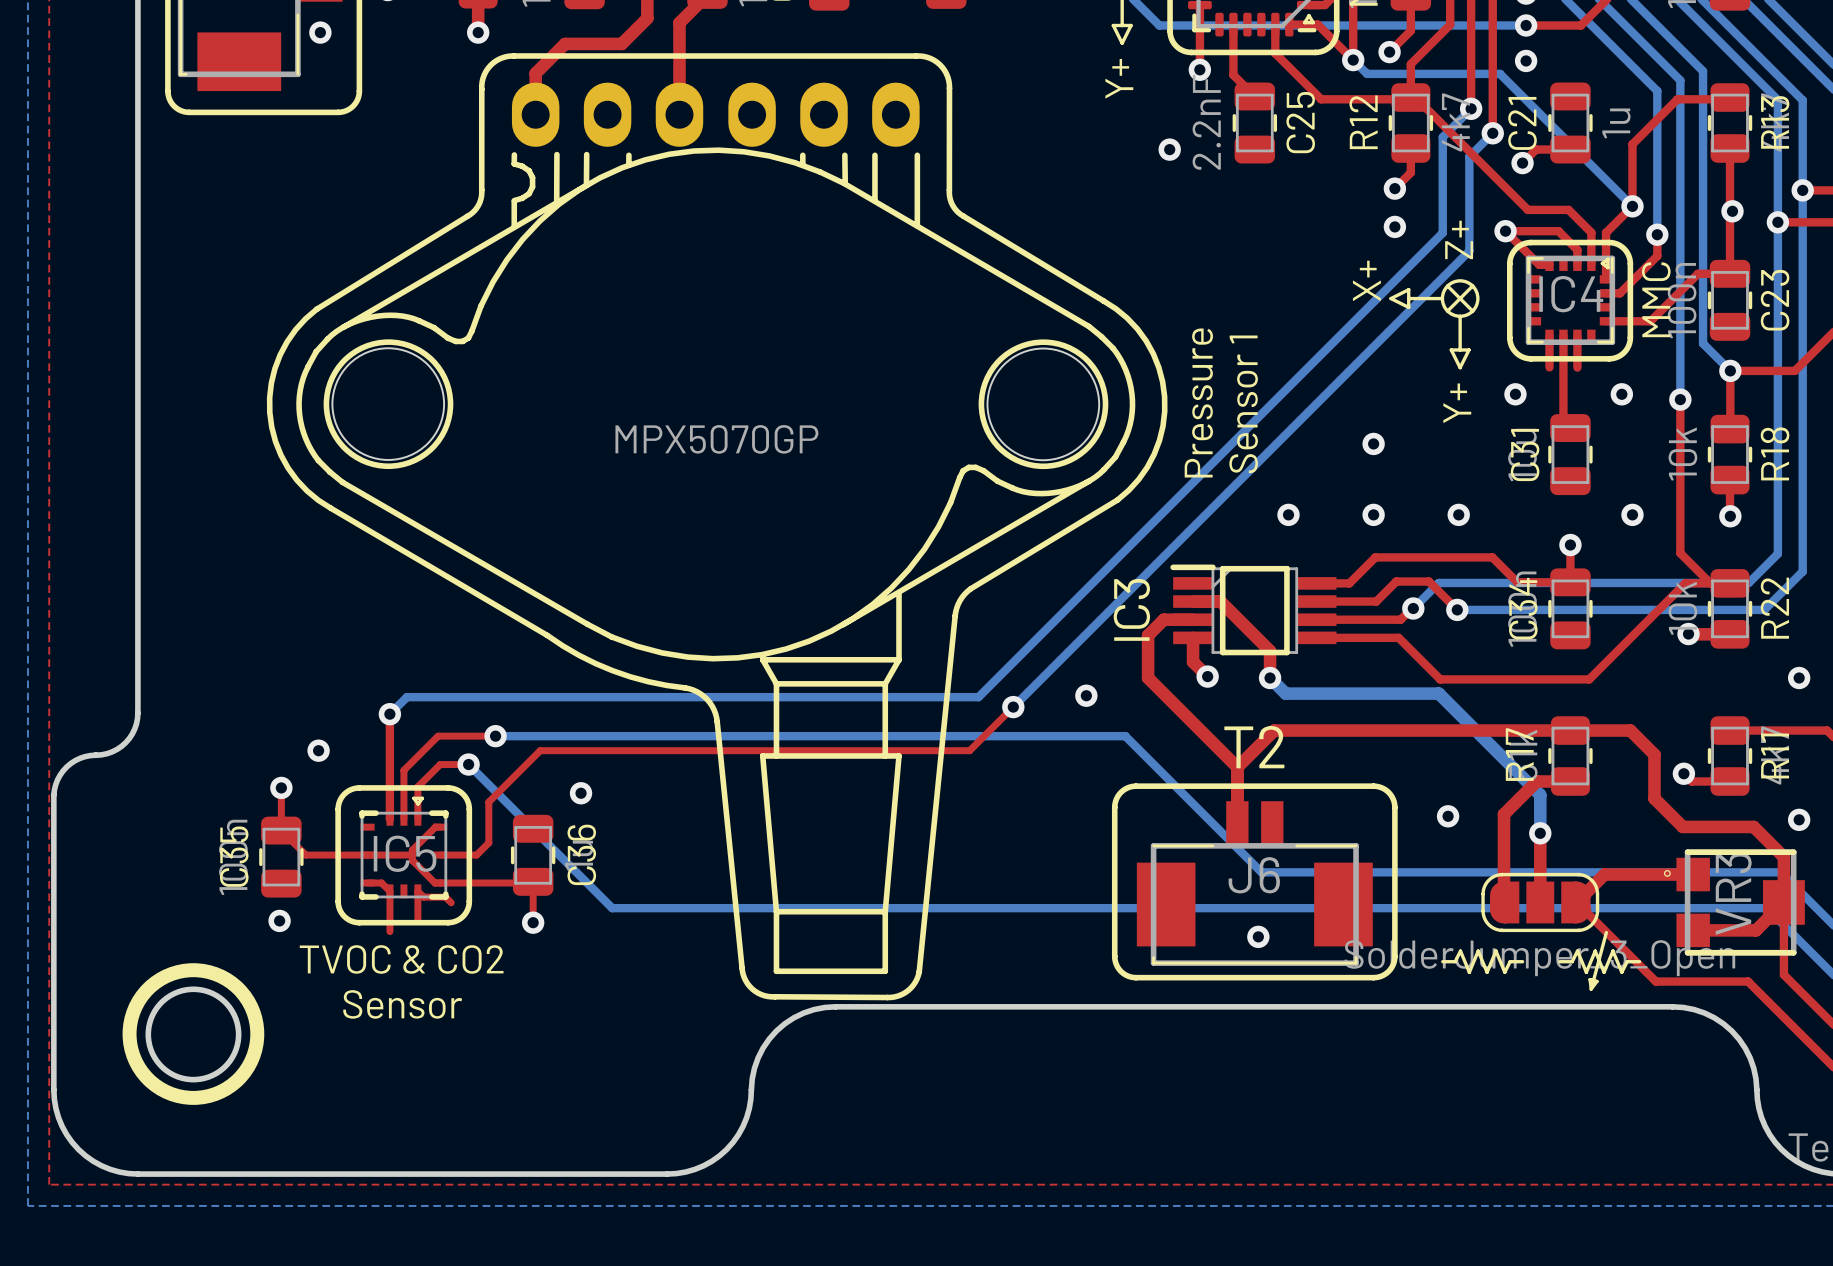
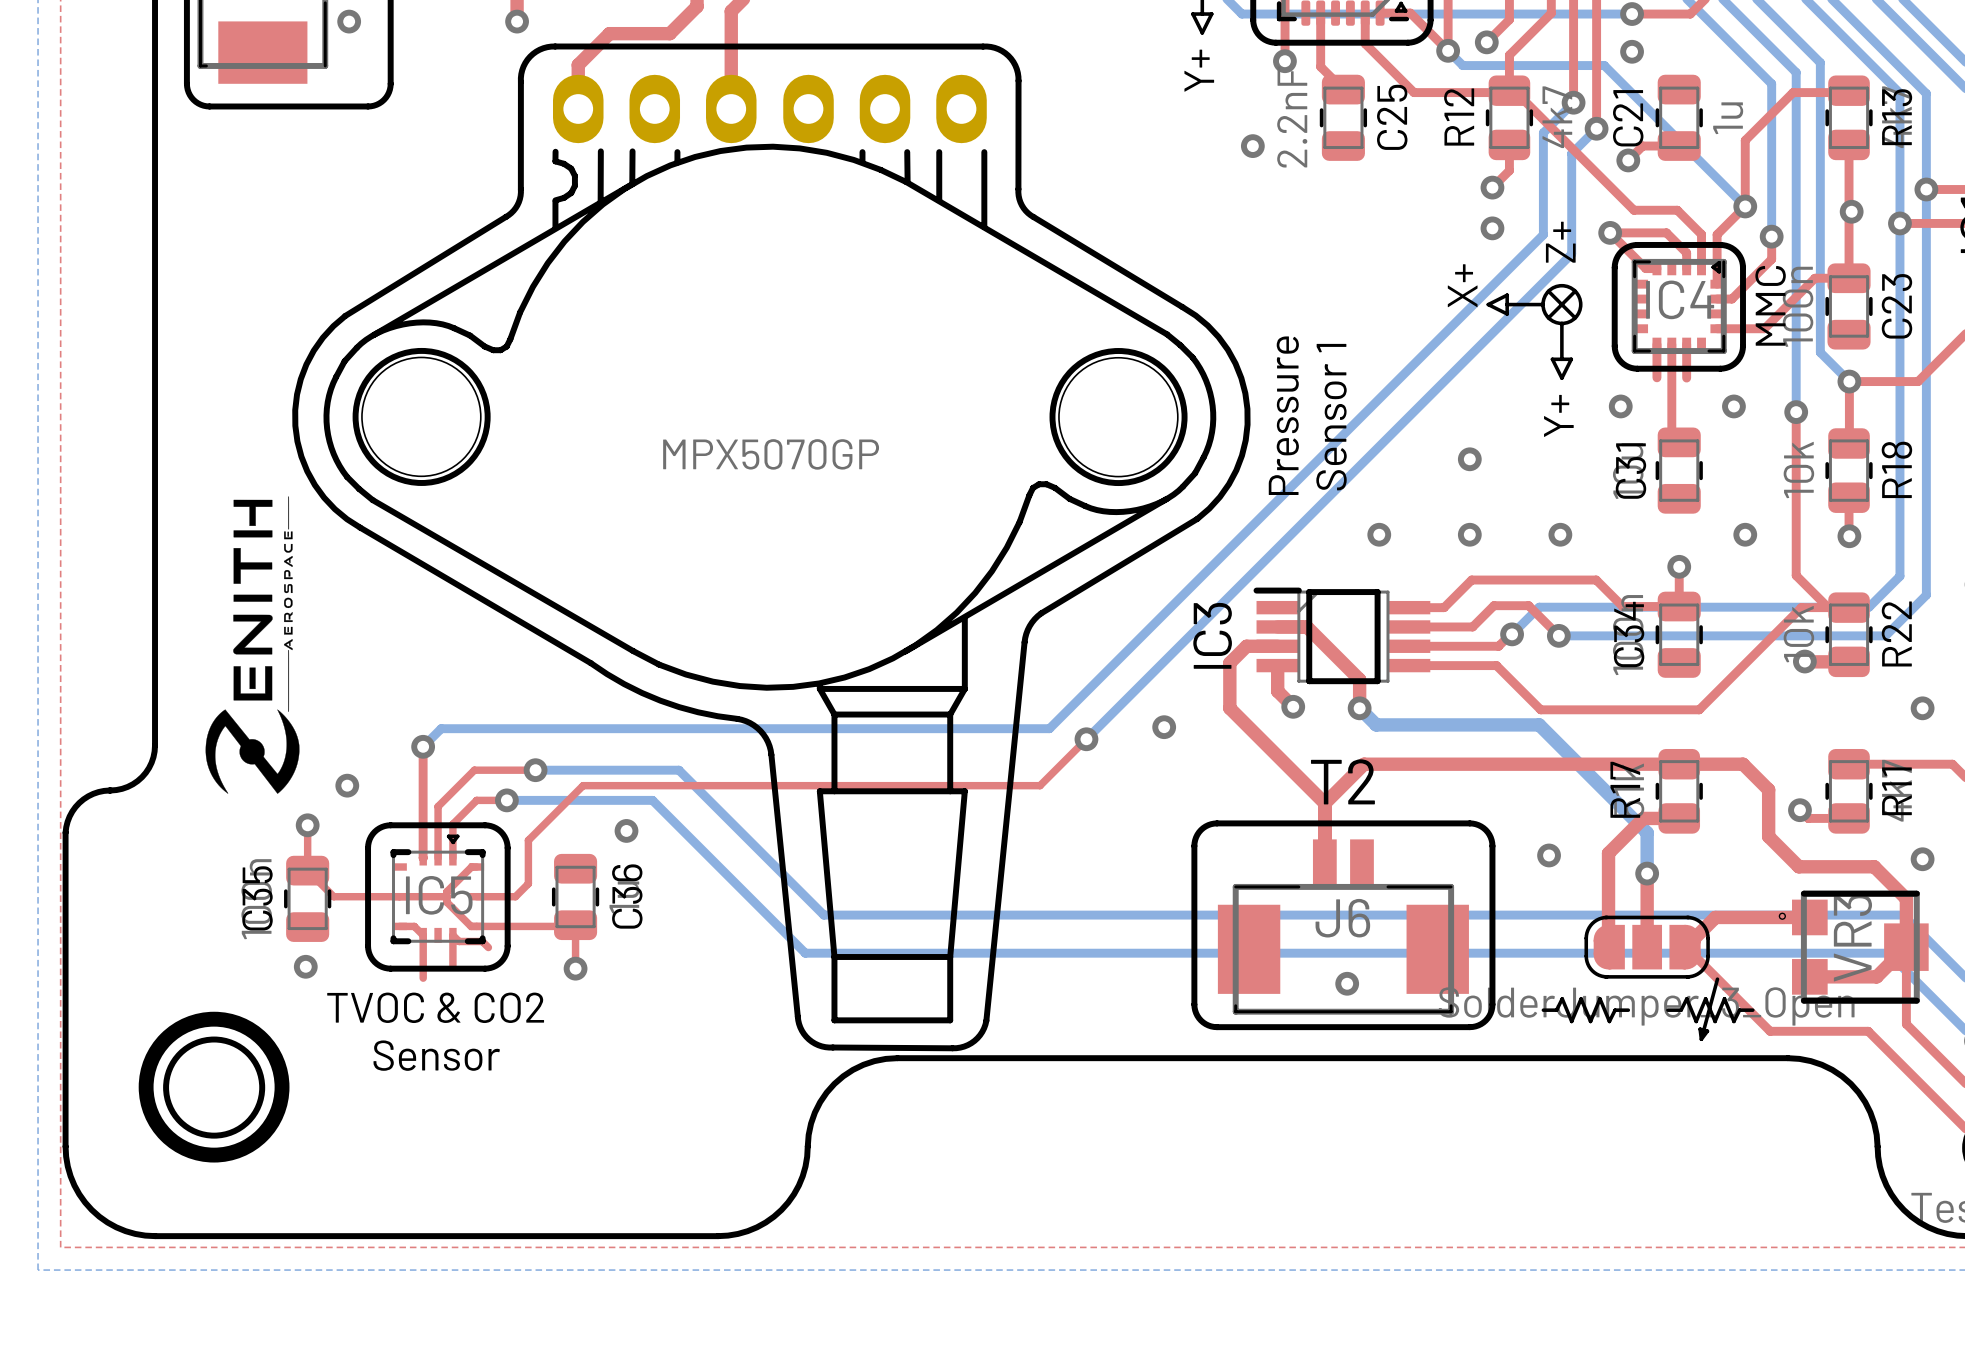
drawing: none -> [205, 496, 300, 794]
bottom track: (630, 736) (1125, 736) (1261, 872) -> (678, 770) (823, 915) (1350, 915)
bottom track: (468, 764) (612, 908) (749, 908) -> (506, 800) (652, 800) (805, 953)

